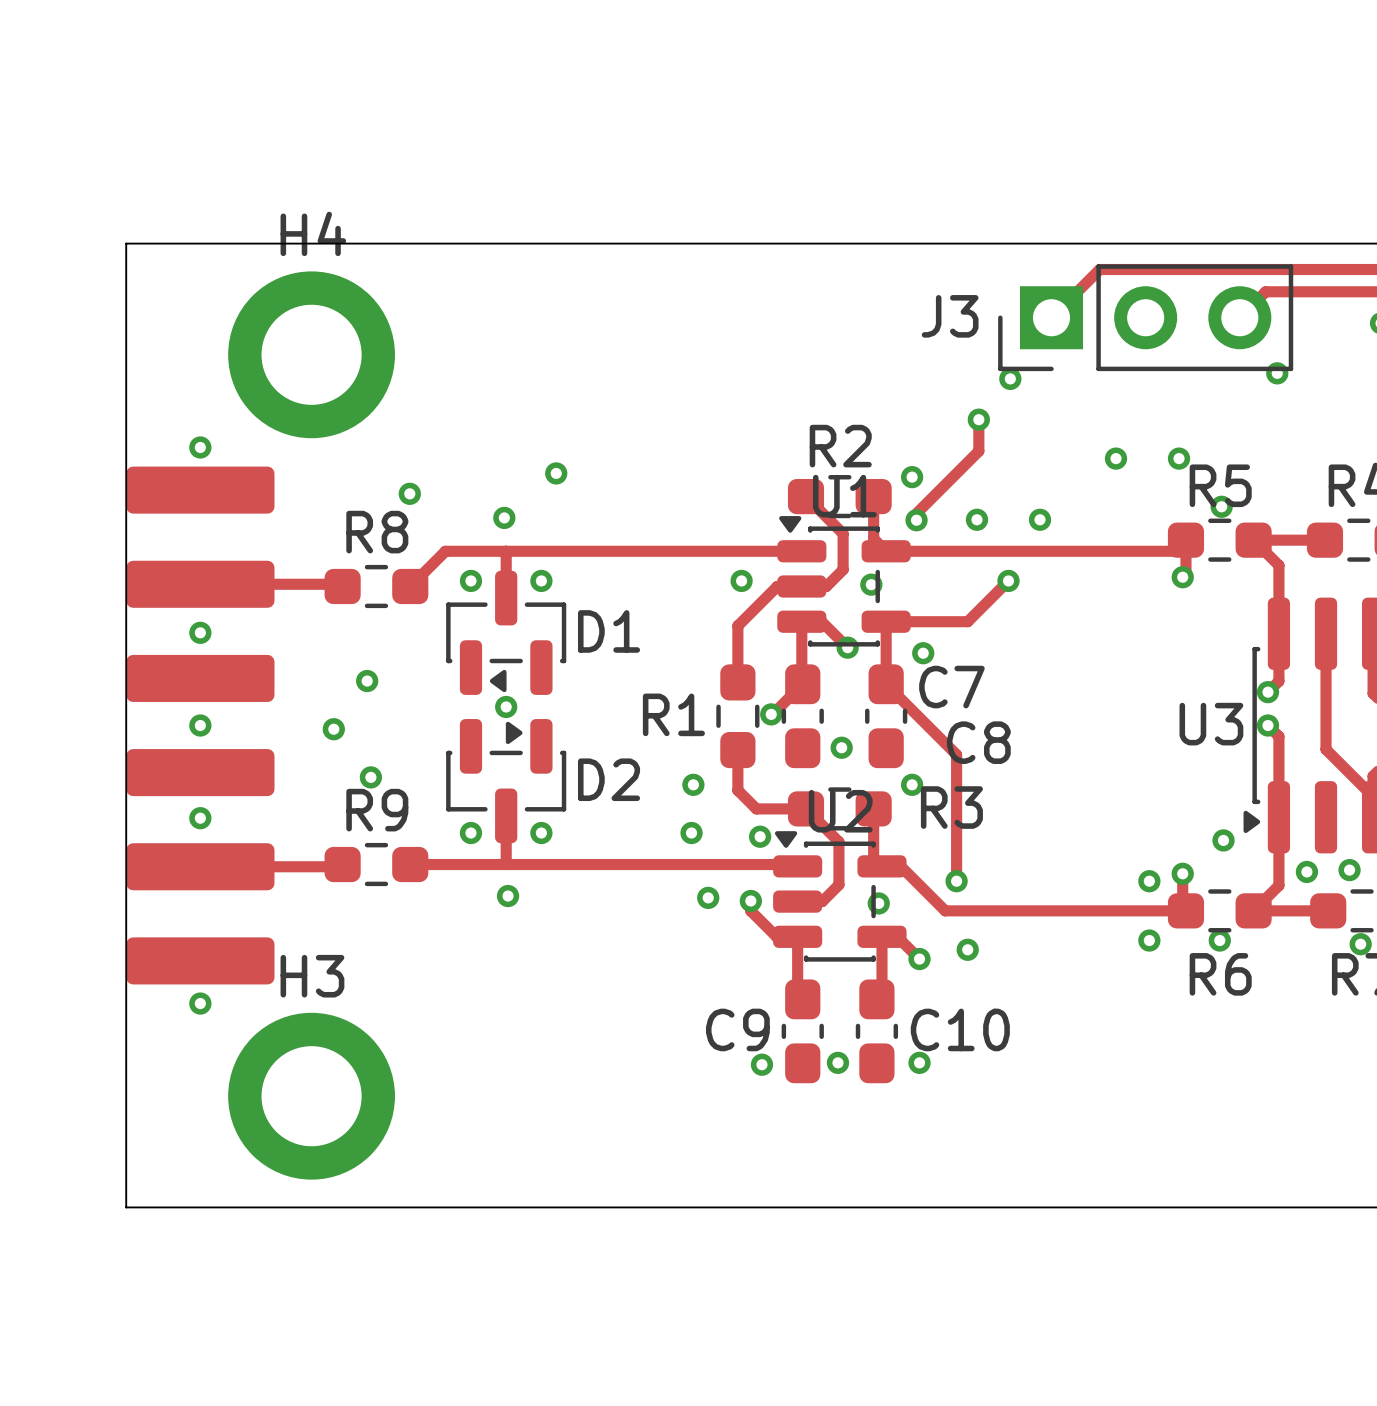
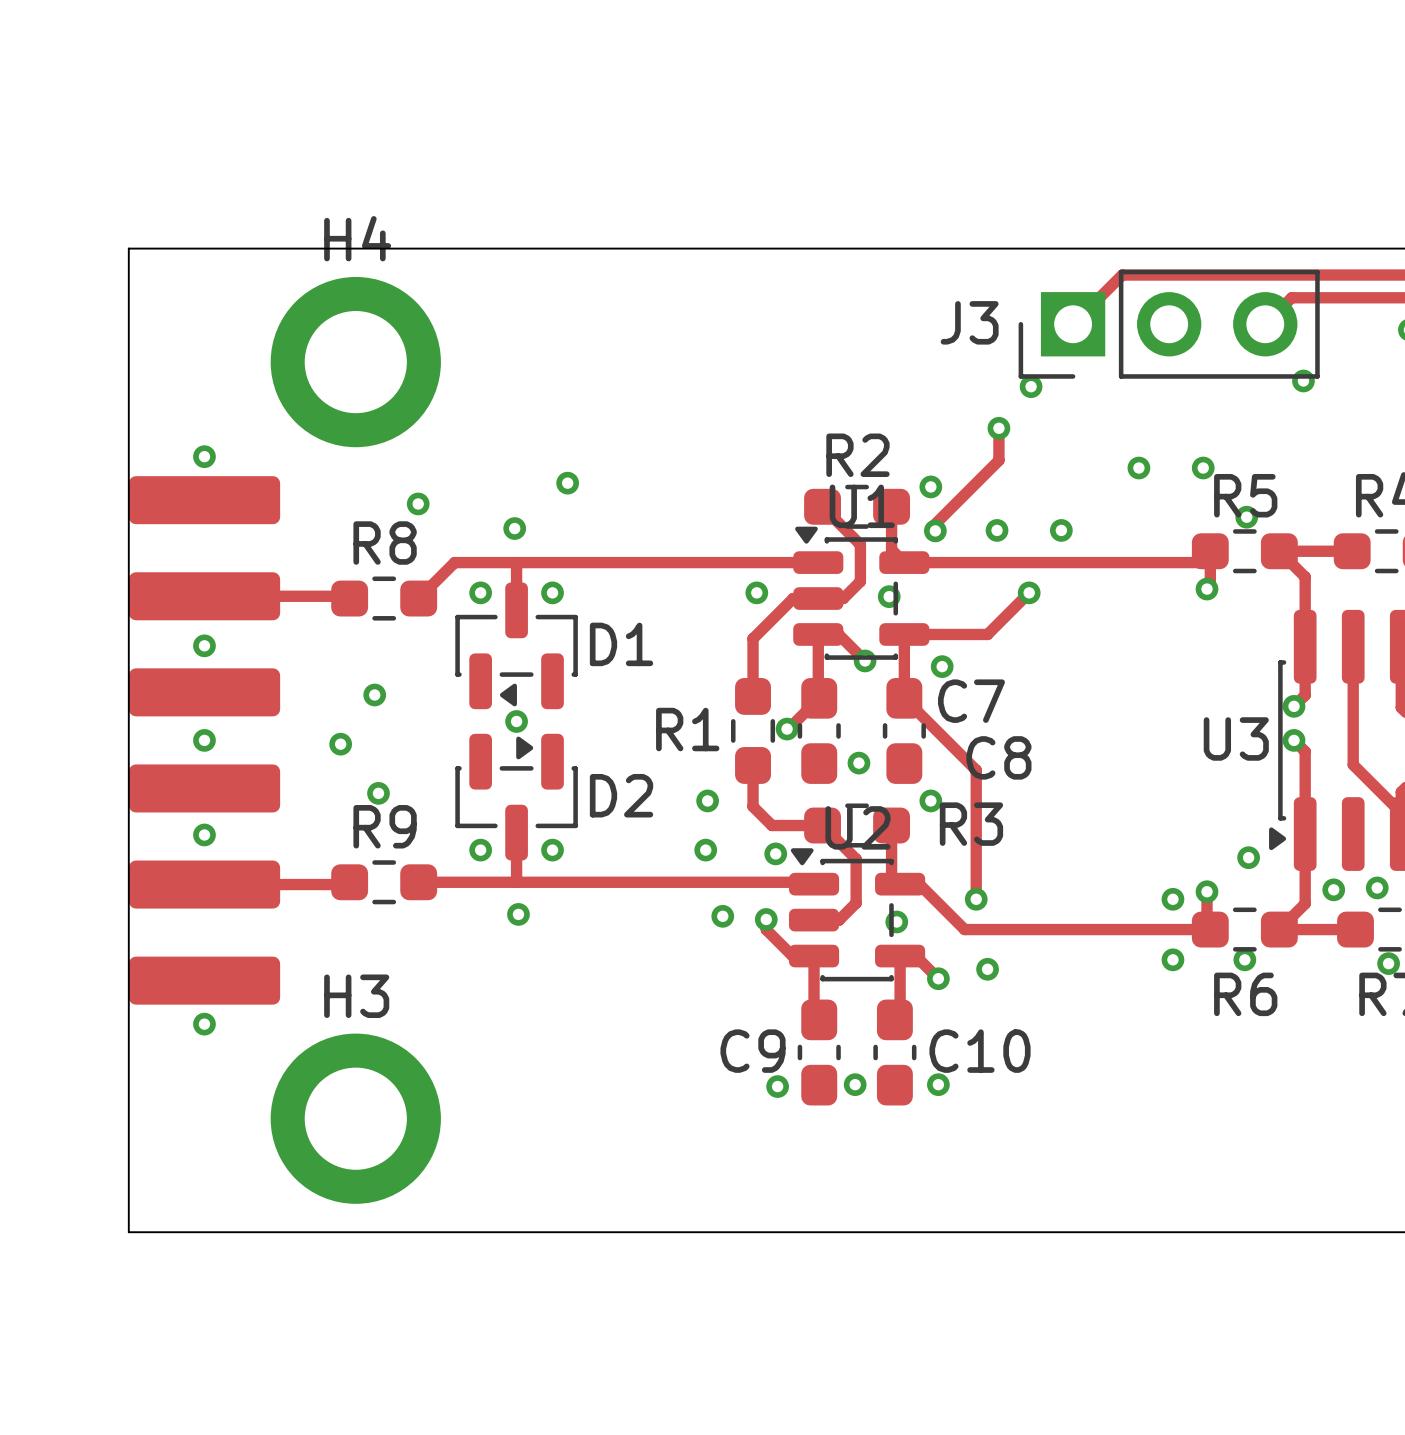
H4 position: (311, 354) -> (355, 362)
H3 position: (311, 1096) -> (355, 1118)

